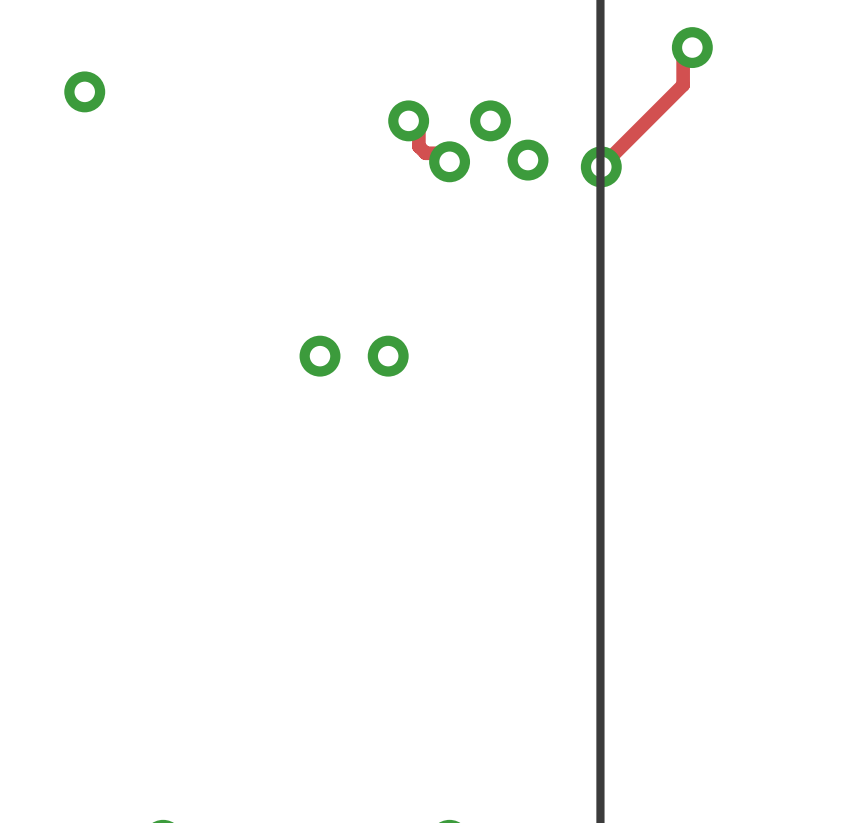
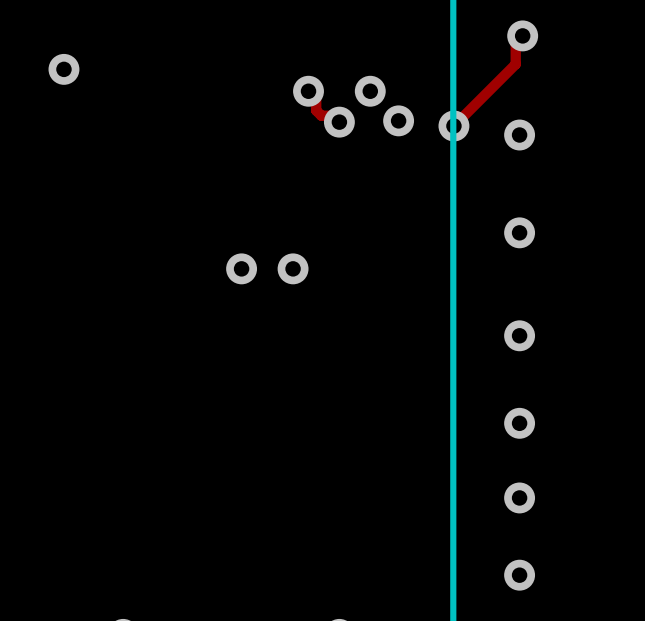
via: none -> (519, 135)
via: none -> (519, 232)
via: none -> (519, 335)
via: none -> (519, 423)
via: none -> (519, 497)
via: none -> (519, 575)

